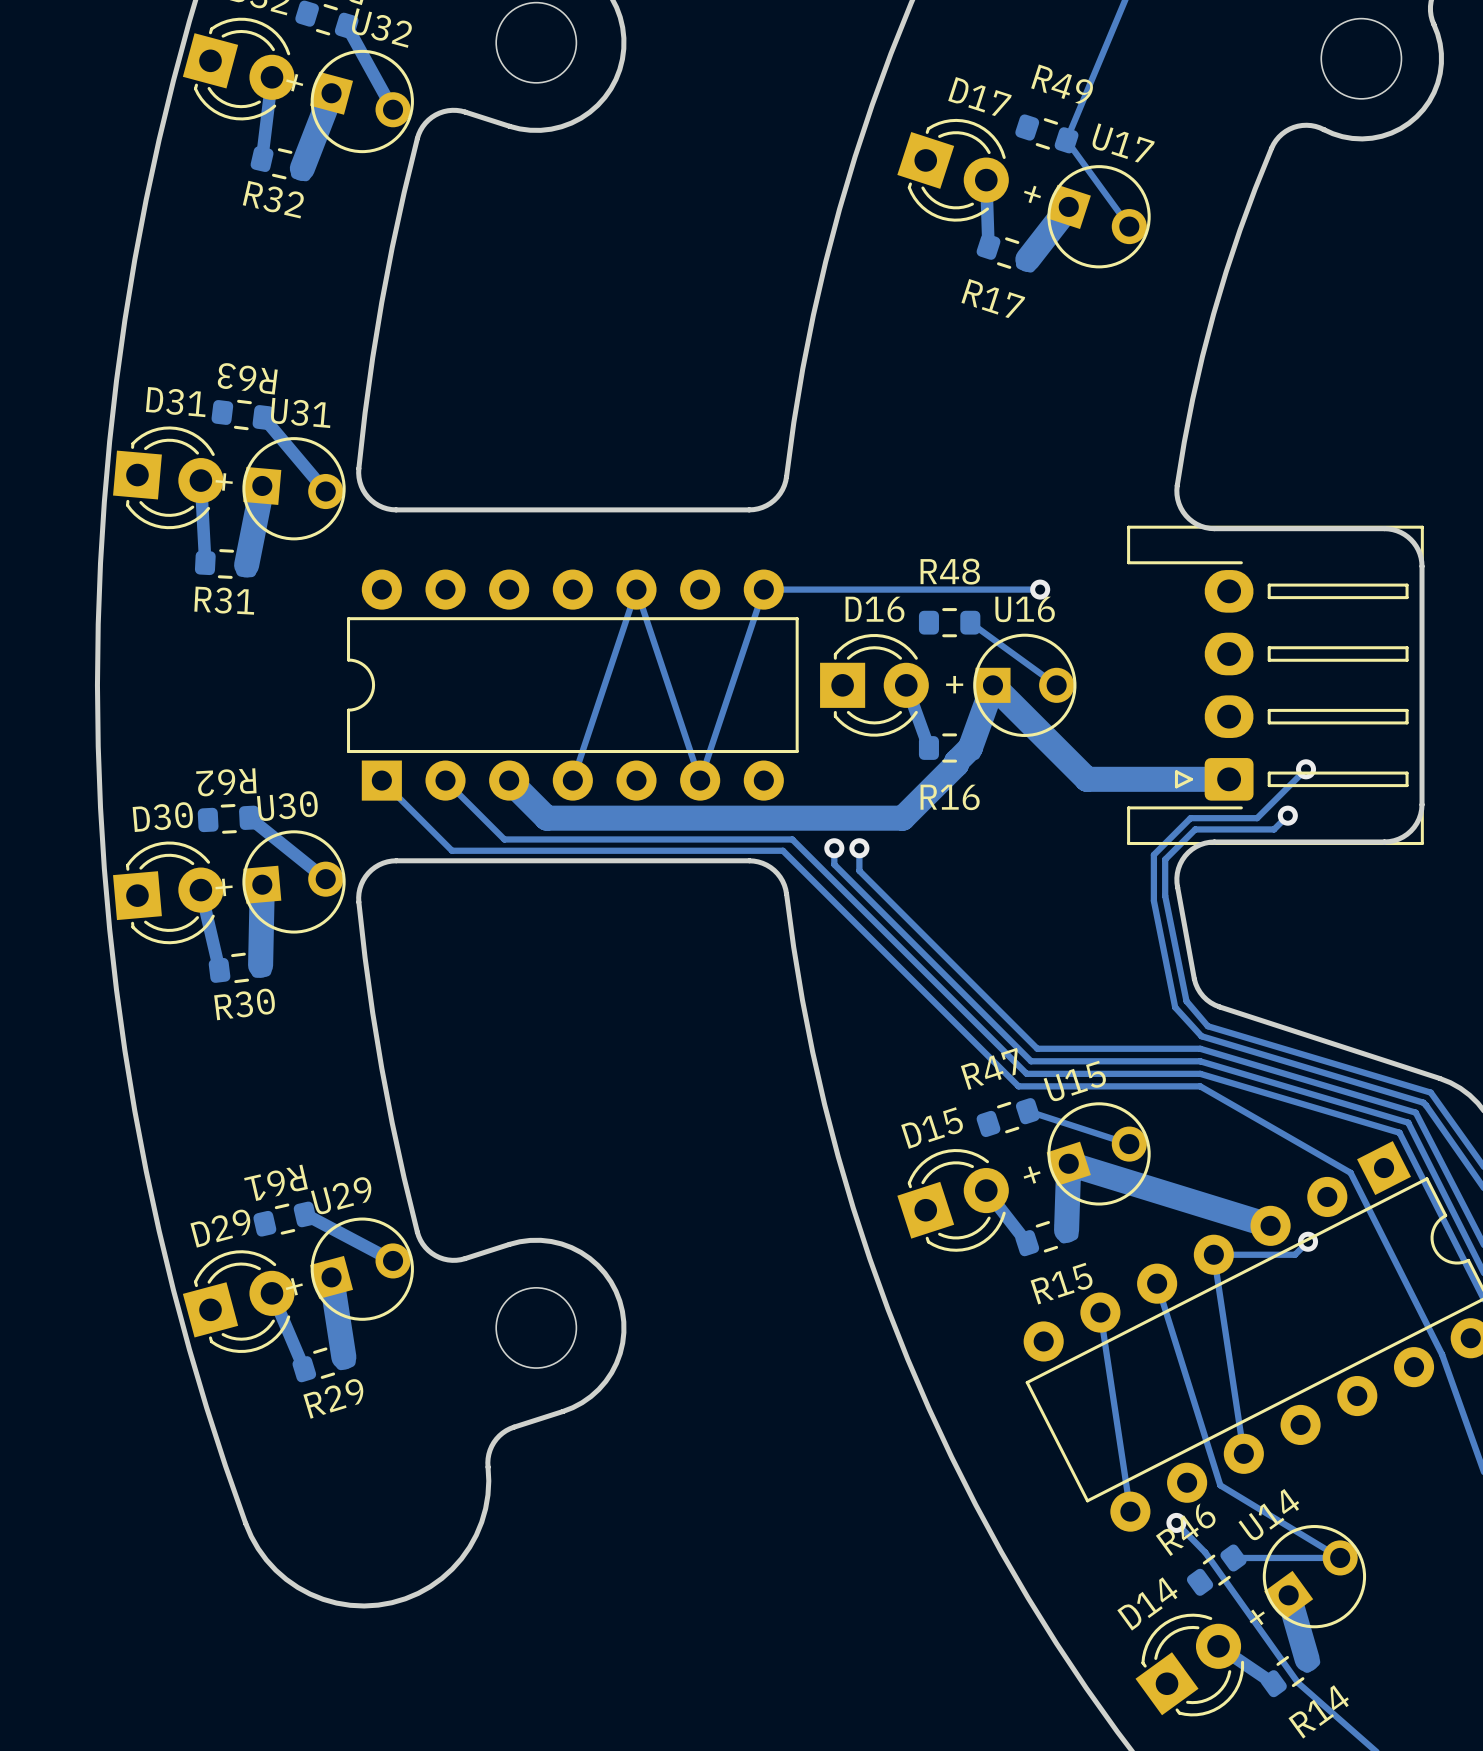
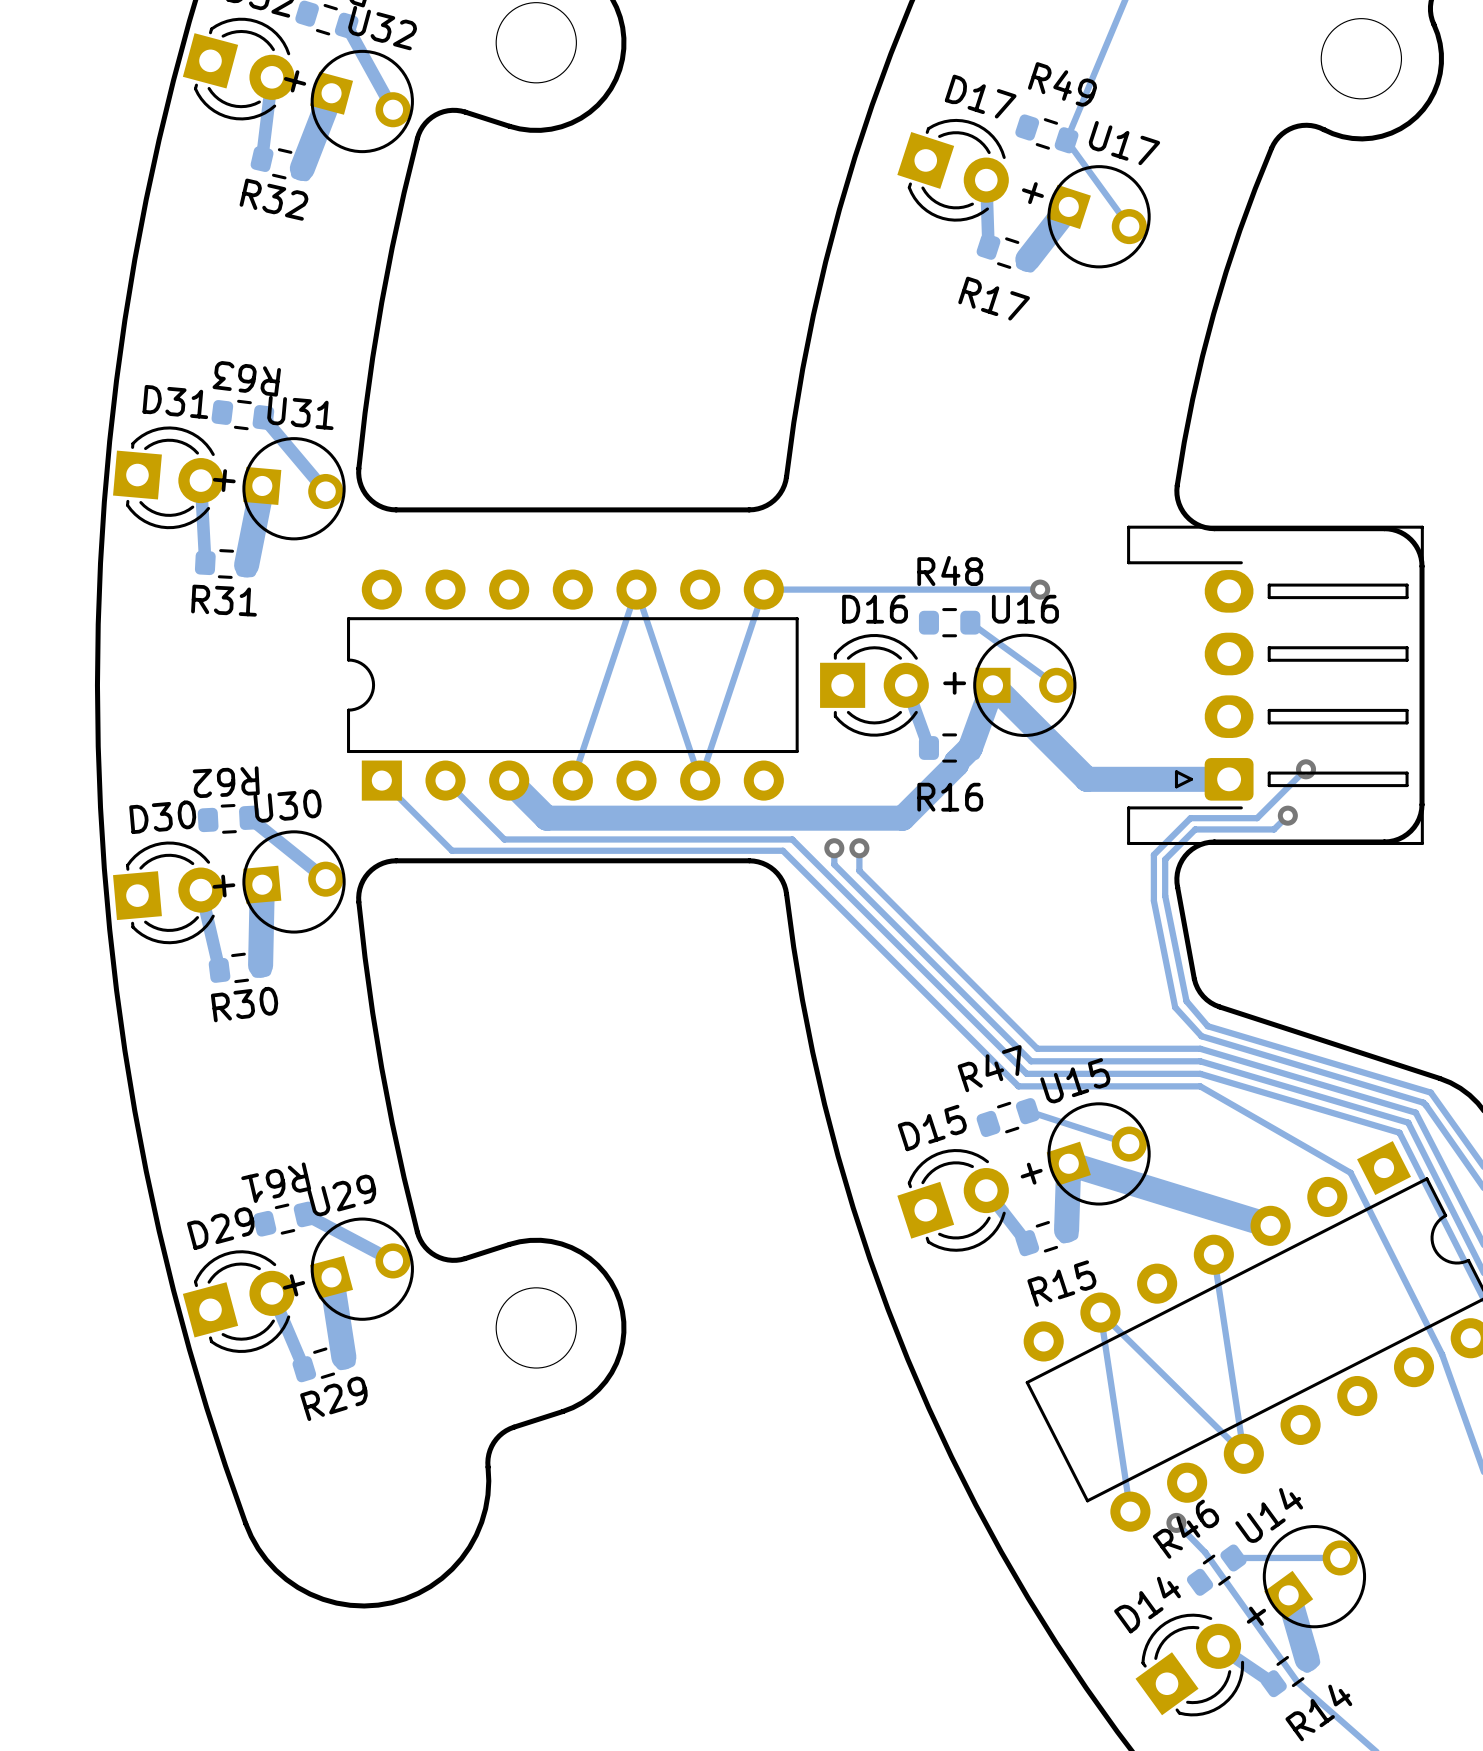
track: (1308, 1241) (1295, 1254) (1213, 1254) -> none
via: (1308, 1241) -> none
track: (1157, 1283) (1220, 1485) (1340, 1557) -> none
track: none -> (1100, 1312) (1243, 1453)

